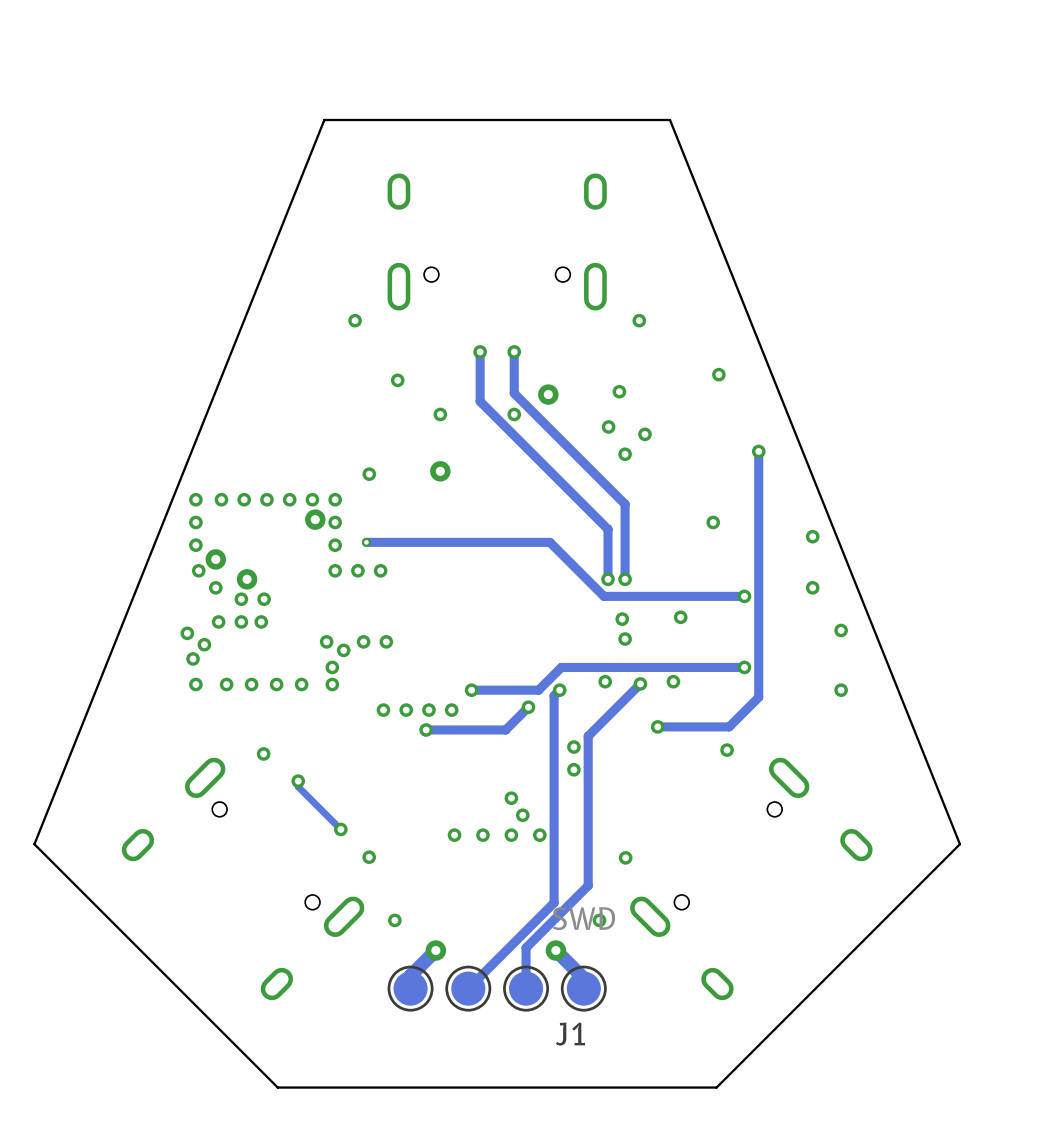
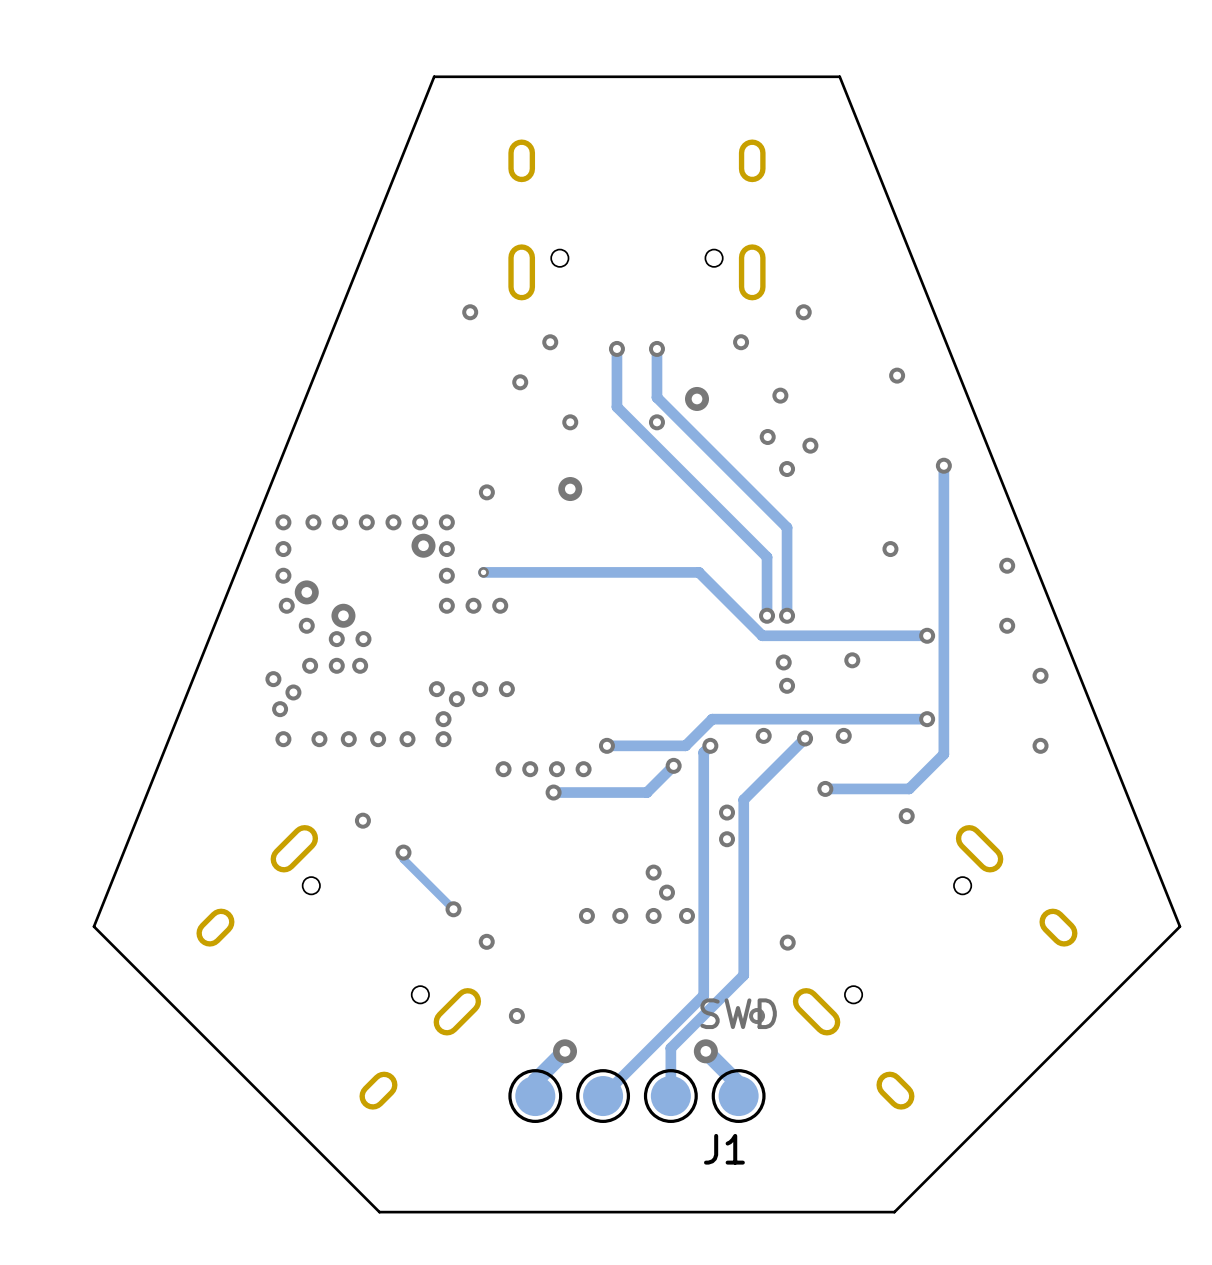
via: none -> (550, 342)
via: none -> (741, 342)

